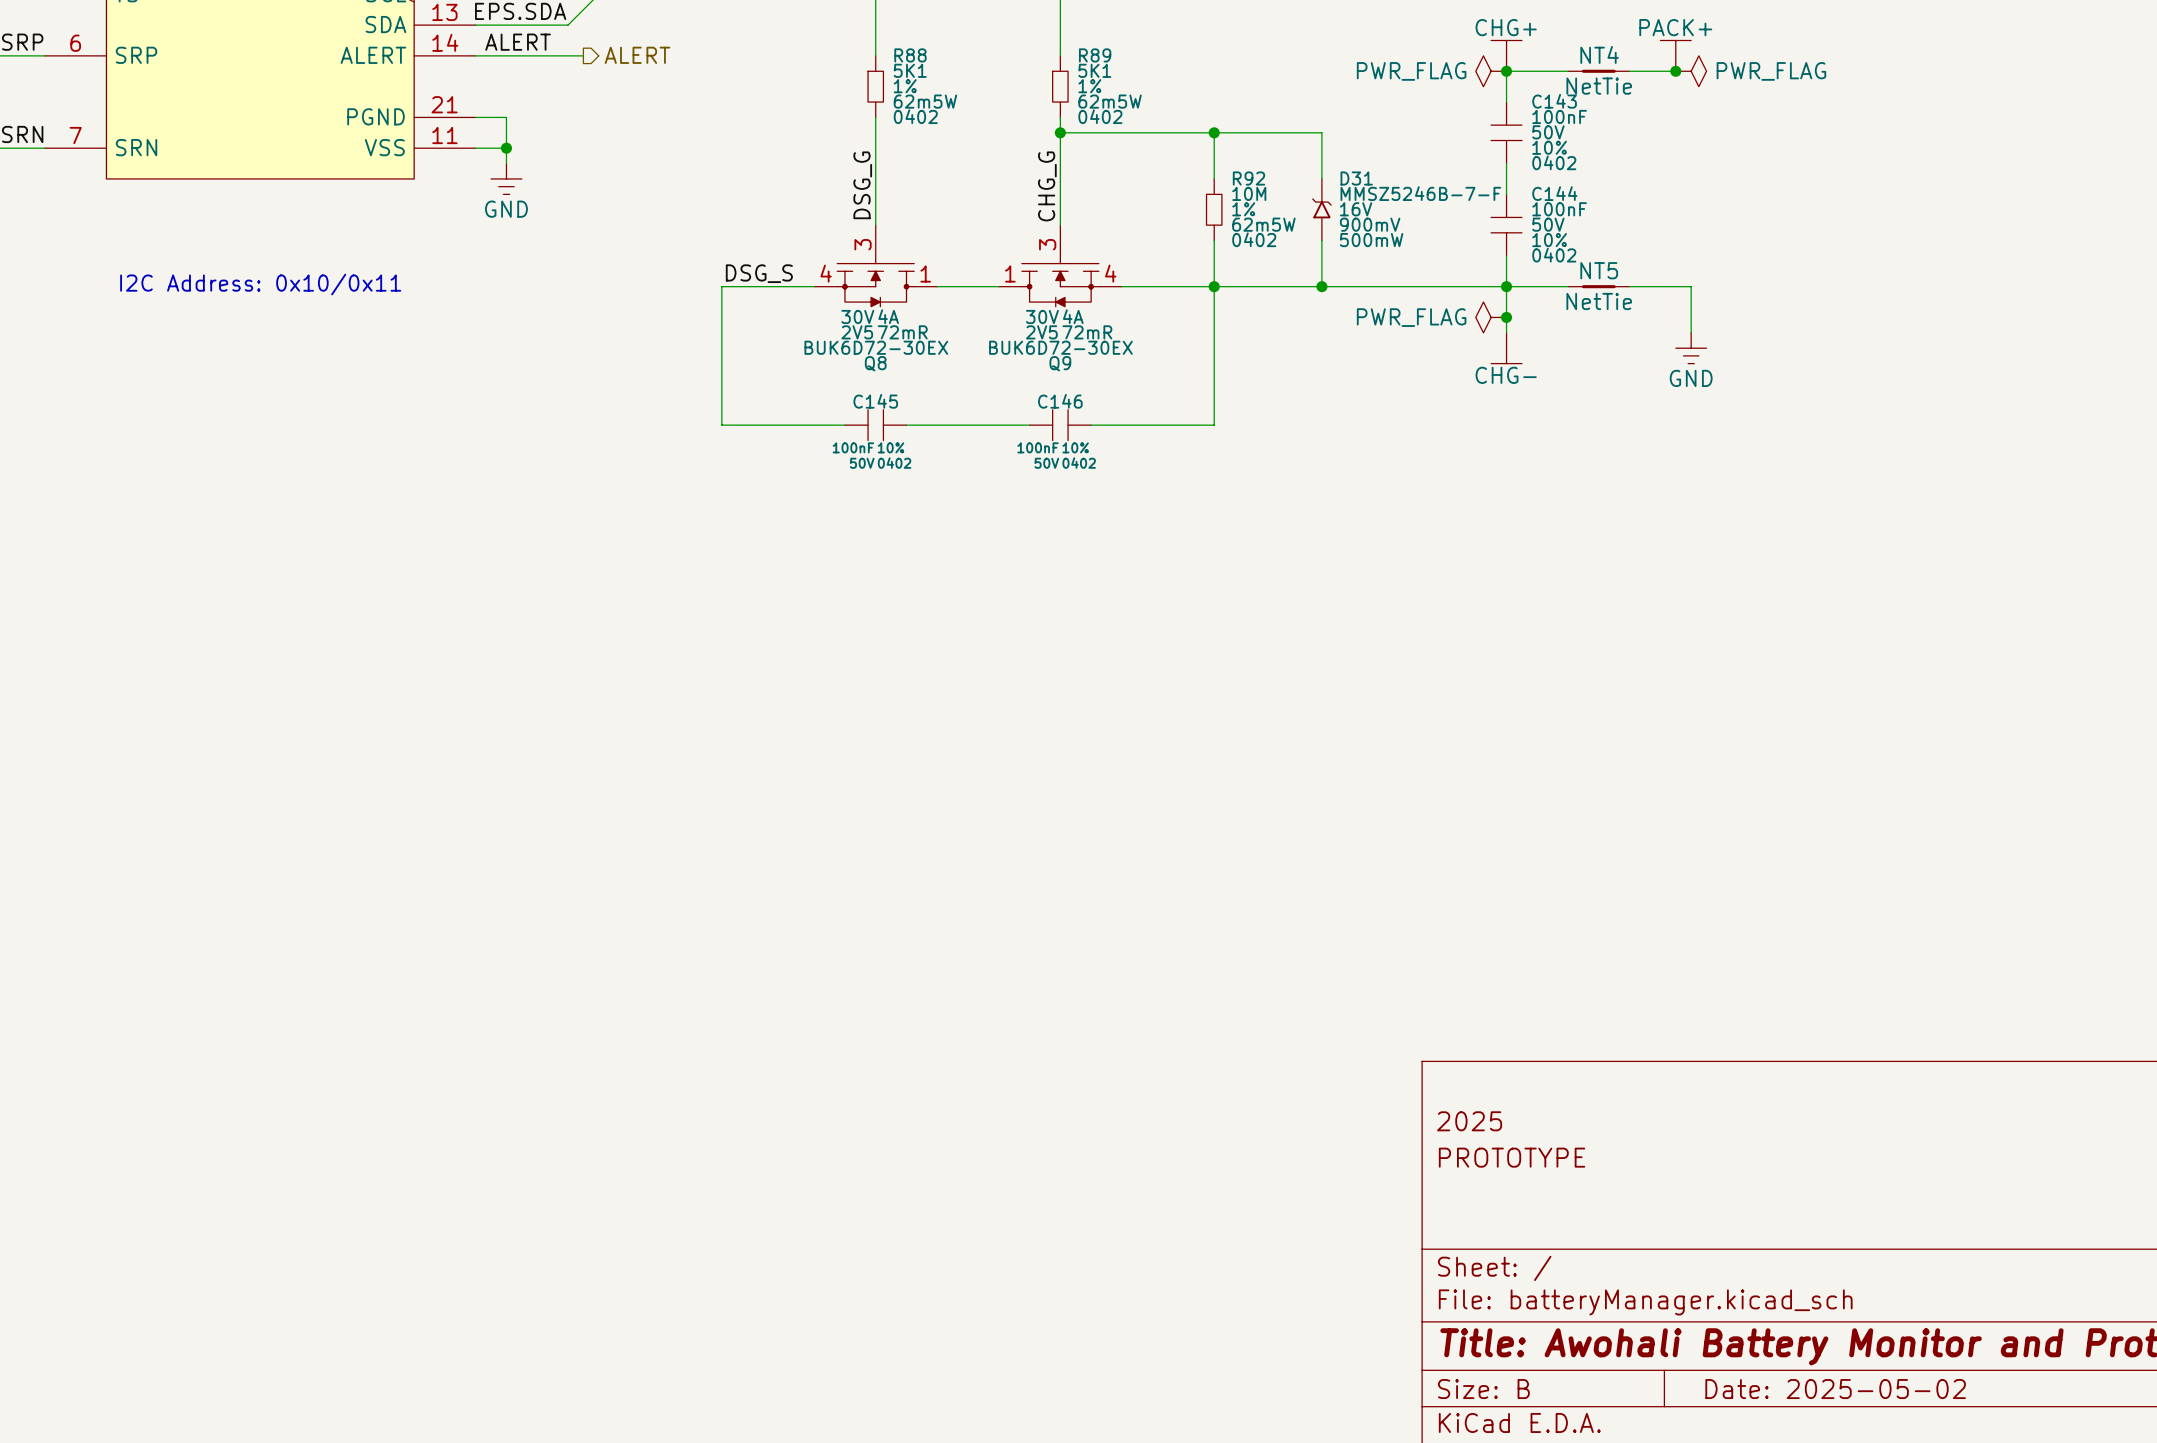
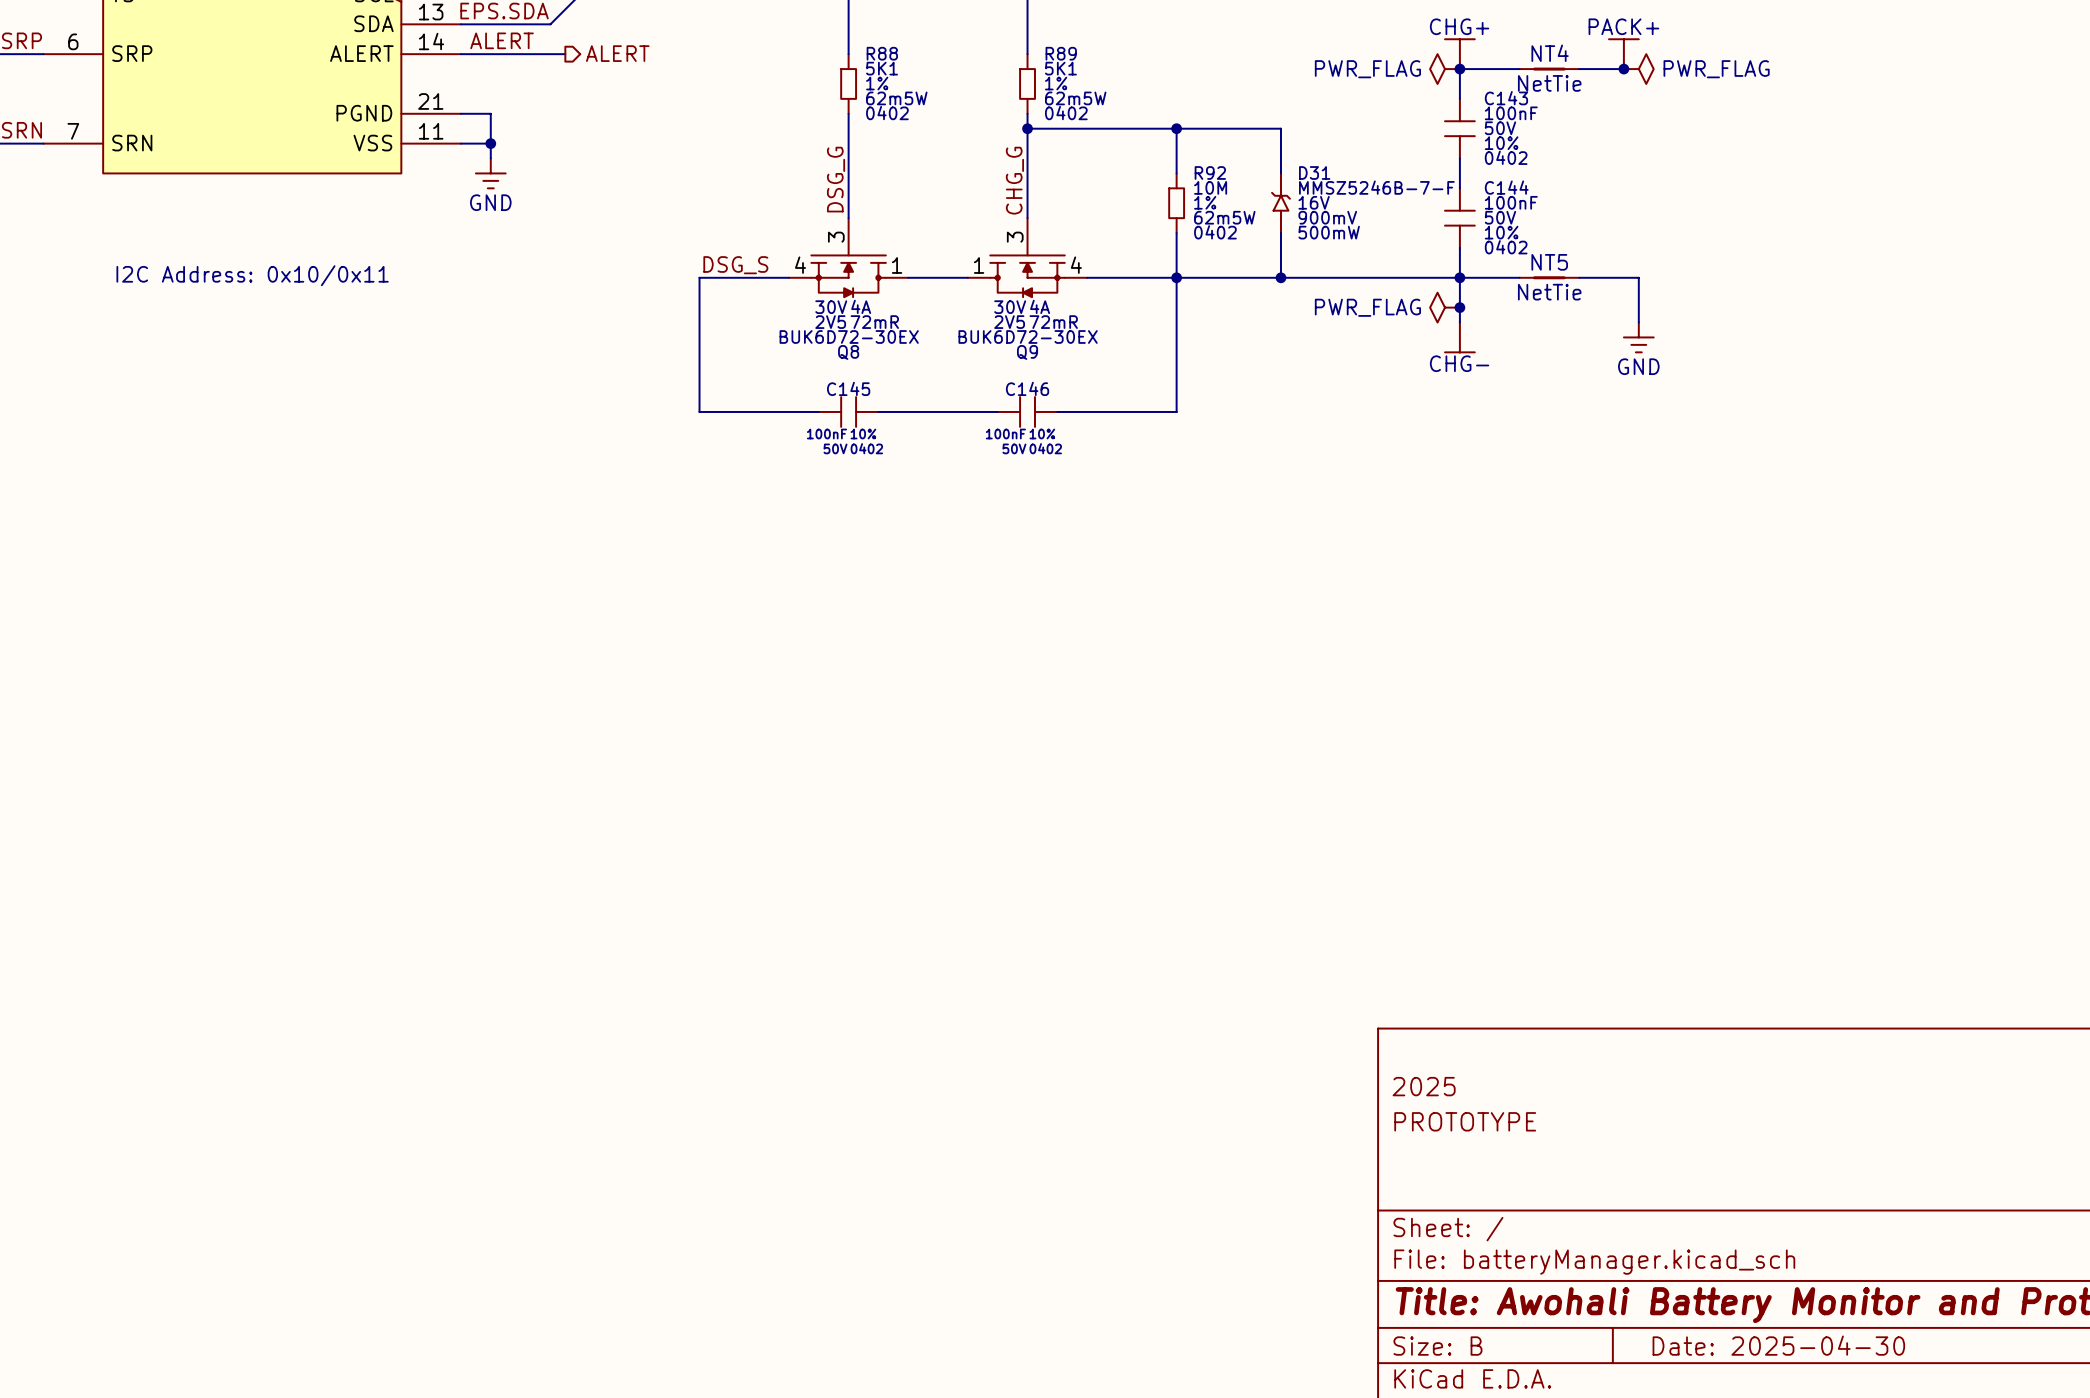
title block: Date: 2025-05-02 (1835, 1389) -> Date: 2025-04-30 (1778, 1345)

